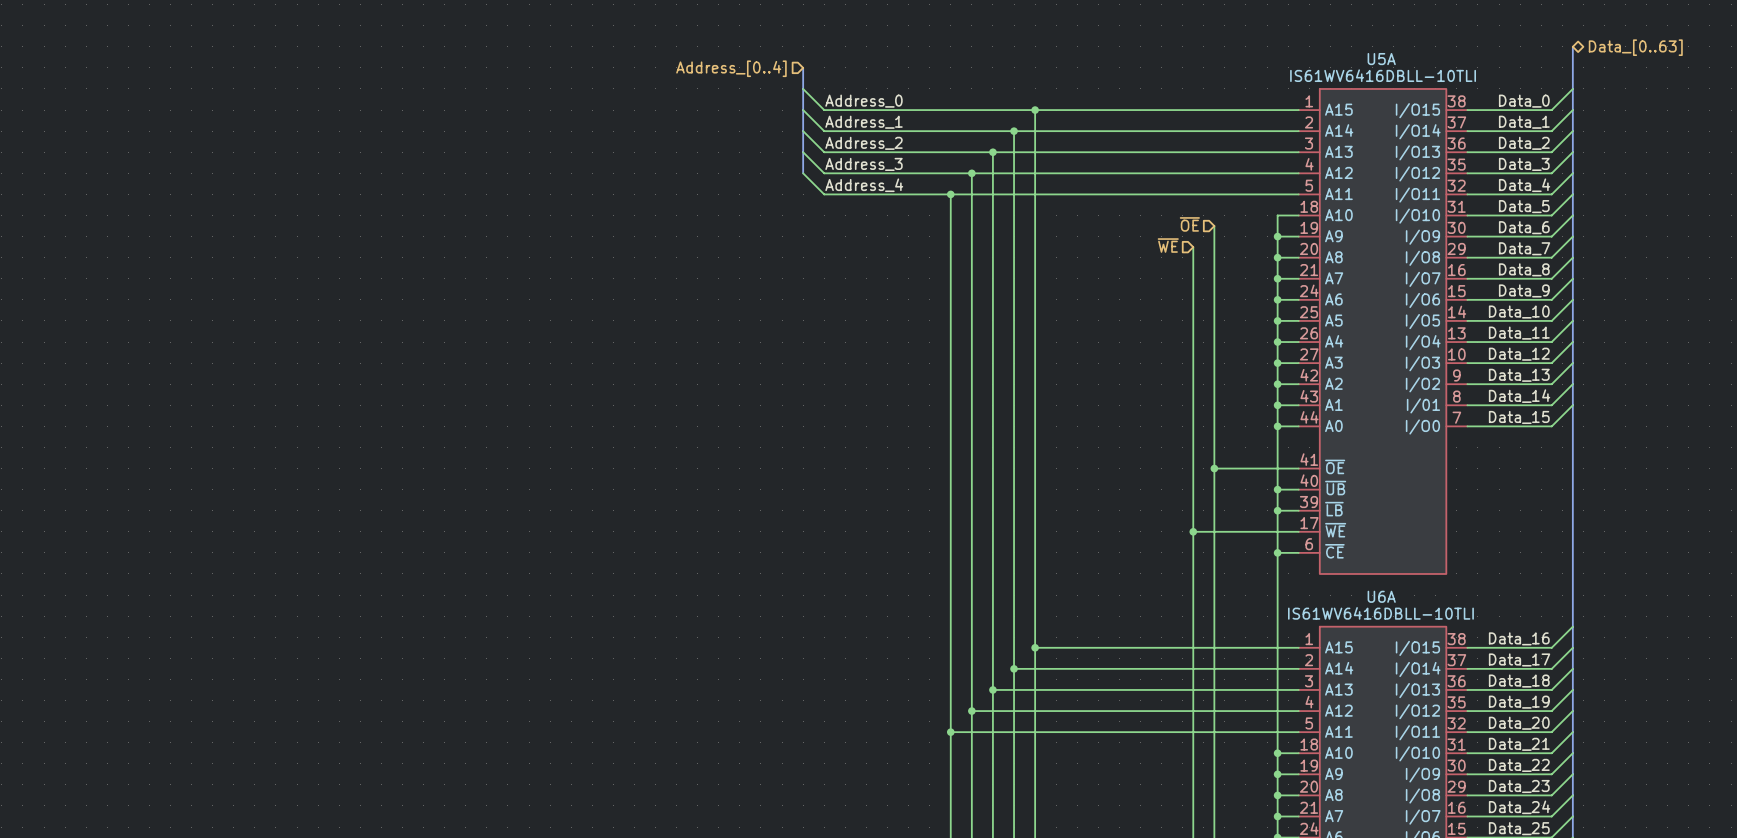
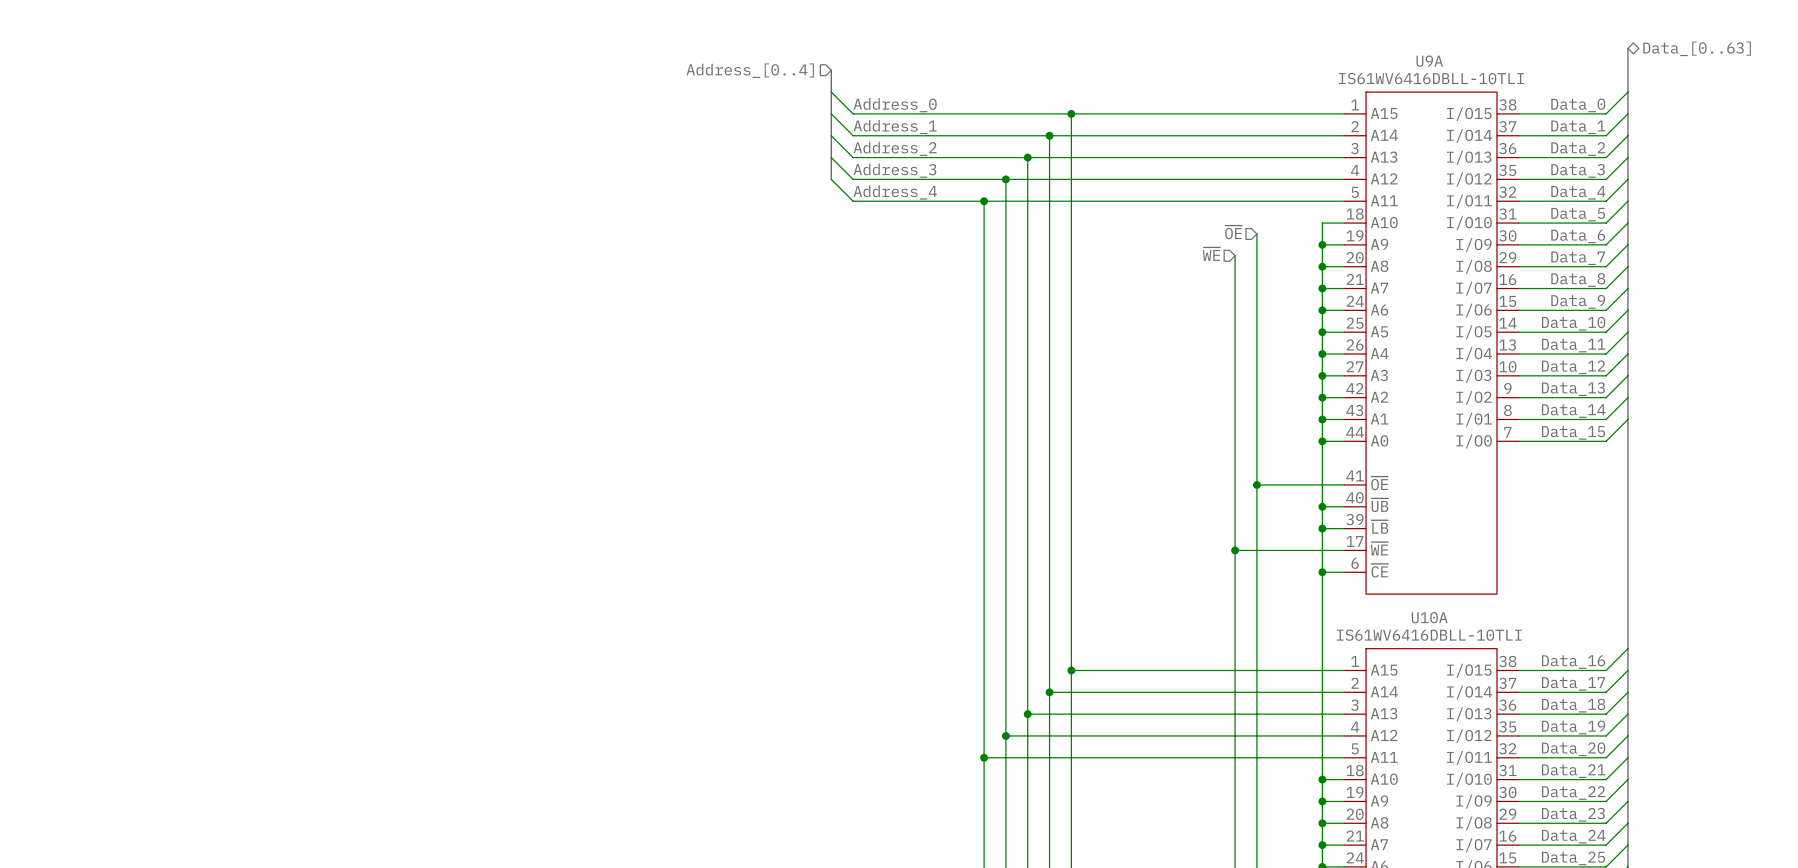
U5A name: U5A (1381, 59) -> U9A (1429, 61)
U6A name: U6A (1381, 596) -> U10A (1429, 617)

